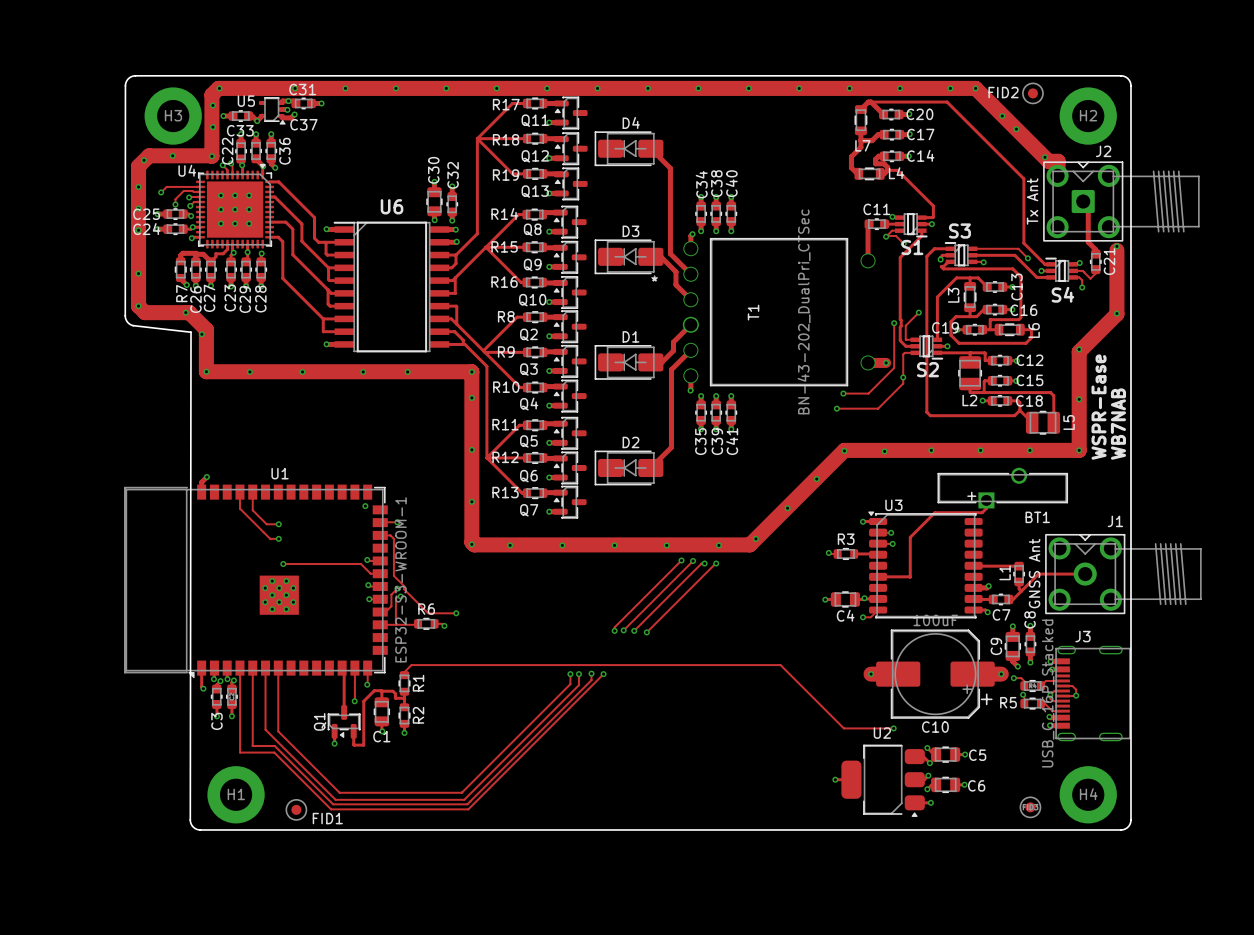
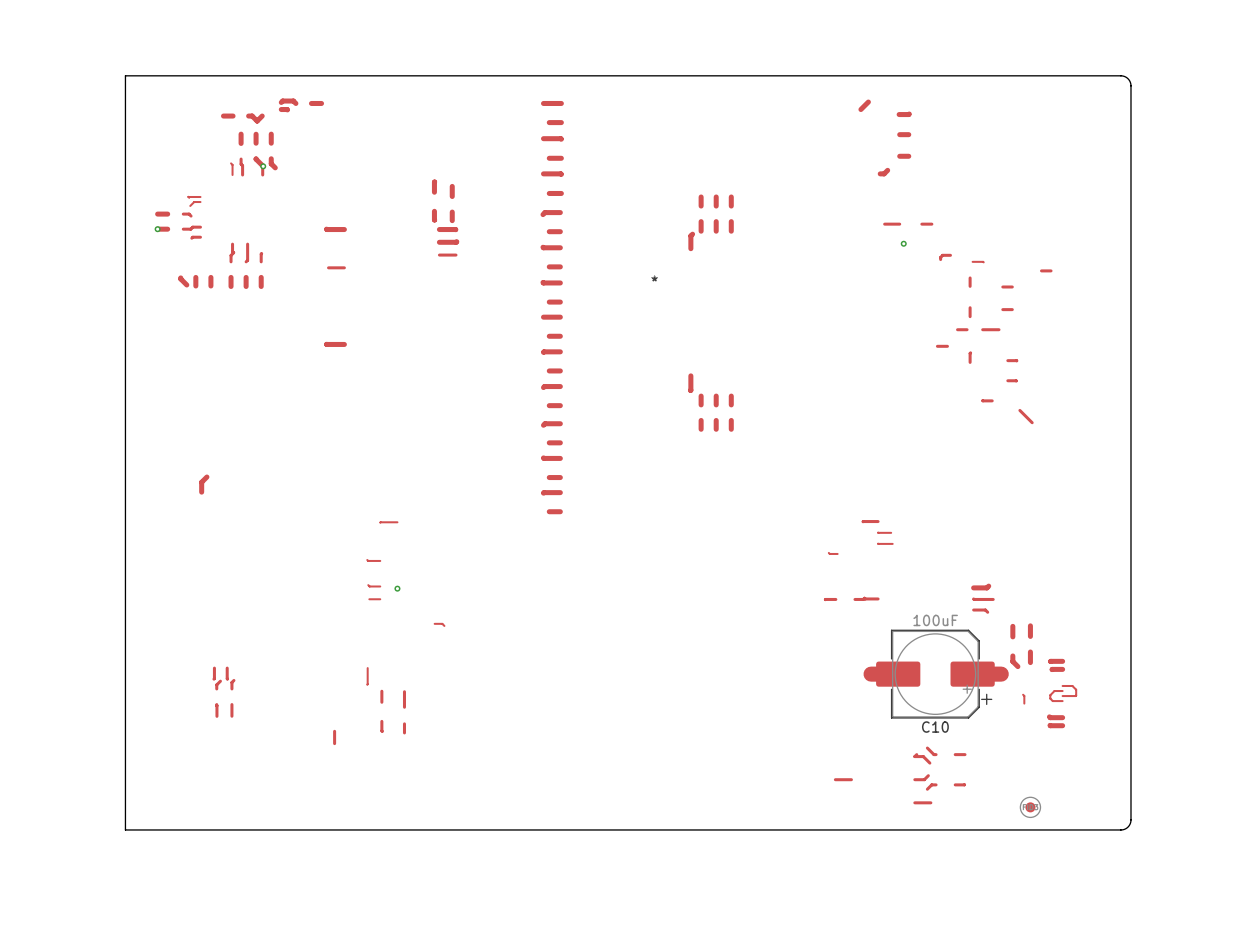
board edge: (135, 75) (128, 78) (125, 85) (125, 318) (128, 322) (133, 325) (191, 332) (190, 819) (193, 827) (200, 829) -> (135, 75) (125, 75) (125, 829) (200, 829)
via: (219, 88) -> none
via: (295, 88) -> none
via: (345, 88) -> none
via: (395, 88) -> none
via: (446, 88) -> none
via: (496, 88) -> none
via: (547, 88) -> none
via: (597, 88) -> none
via: (647, 88) -> none
via: (698, 88) -> none
via: (748, 88) -> none
via: (799, 88) -> none
via: (849, 88) -> none
via: (900, 88) -> none
via: (950, 88) -> none
via: (975, 88) -> none
FID2: (1032, 93) -> none
via: (288, 101) -> none
C31: (303, 103) -> none
via: (321, 103) -> none
track: (526, 103) (512, 103) (477, 138) -> none
R17: (535, 103) -> none
via: (212, 105) -> none
via: (287, 109) -> none
U5: (272, 110) -> none
Q11: (570, 113) -> none
track: (294, 114) (291, 117) (281, 116) -> none
via: (294, 114) -> none
track: (881, 114) (883, 114) (871, 102) (868, 102) (947, 102) (1023, 178) (1023, 243) (1045, 264) (1051, 264) -> none
C20: (891, 114) -> none
via: (909, 114) -> none
H3: (173, 116) -> none
via: (223, 116) -> none
C33: (240, 116) -> none
via: (1002, 116) -> none
H2: (1088, 116) -> none
L7: (860, 120) -> none
via: (257, 121) -> none
via: (549, 122) -> none
via: (212, 127) -> none
via: (1016, 129) -> none
track: (860, 130) (860, 147) (851, 156) (851, 167) (858, 173) -> none
via: (241, 134) -> none
via: (256, 134) -> none
via: (271, 134) -> none
track: (884, 134) (878, 134) (872, 140) (860, 140) -> none
C17: (891, 134) -> none
via: (909, 134) -> none
track: (477, 138) (512, 173) (526, 173) -> none
track: (477, 138) (477, 233) (456, 255) (456, 263) (451, 267) (439, 267) -> none
track: (477, 138) (526, 138) -> none
R18: (535, 138) -> none
Q12: (570, 148) -> none
D4: (629, 148) -> none
track: (650, 148) (670, 168) (670, 253) (690, 274) -> none
C37: (256, 150) -> none
C36: (271, 150) -> none
C22: (241, 151) -> none
via: (172, 155) -> none
via: (211, 156) -> none
track: (884, 156) (878, 156) (875, 159) (875, 163) (884, 163) (887, 170) (897, 170) (933, 206) (932, 217) (921, 217) -> none
C14: (891, 156) -> none
via: (908, 156) -> none
via: (1045, 157) -> none
via: (549, 158) -> none
via: (144, 160) -> none
via: (231, 163) -> none
track: (222, 165) (227, 170) (227, 175) -> none
via: (222, 165) -> none
via: (242, 165) -> none
via: (275, 167) -> none
R19: (535, 173) -> none
L4: (869, 173) -> none
track: (1057, 175) (1058, 161) (1048, 161) (975, 88) (218, 88) (211, 94) (211, 156) (149, 155) (138, 166) (138, 306) (145, 312) (189, 312) (206, 329) (206, 371) (471, 371) (471, 542) (474, 544) (749, 544) (844, 450) (1079, 450) (1079, 351) (1116, 314) (1116, 250) -> none
track: (269, 181) (278, 181) (314, 217) (314, 238) (318, 242) (344, 242) -> none
via: (434, 181) -> none
Q13: (570, 183) -> none
via: (138, 186) -> none
track: (200, 186) (166, 186) (161, 192) -> none
via: (452, 186) -> none
track: (200, 191) (183, 190) (175, 199) (175, 206) -> none
via: (161, 192) -> none
via: (549, 193) -> none
via: (220, 195) -> none
via: (235, 195) -> none
via: (249, 195) -> none
track: (269, 196) (274, 196) (301, 224) (301, 241) (328, 267) (328, 279) (344, 280) -> none
via: (701, 196) -> none
via: (716, 196) -> none
via: (731, 196) -> none
via: (189, 197) -> none
C30: (434, 201) -> none
track: (1083, 201) (1088, 206) (1088, 242) (1095, 249) (1095, 254) -> none
J2: Tx Ant (1121, 201) -> none
via: (175, 204) -> none
C32: (452, 204) -> none
via: (190, 205) -> none
U4: (235, 206) -> none
via: (138, 208) -> none
via: (220, 209) -> none
via: (235, 209) -> none
via: (249, 209) -> none
C34: (701, 213) -> none
C38: (716, 213) -> none
C40: (731, 213) -> none
via: (157, 214) -> none
C25: (175, 214) -> none
track: (526, 214) (518, 214) (452, 280) (439, 280) -> none
R14: (534, 214) -> none
via: (191, 216) -> none
via: (892, 216) -> none
via: (434, 220) -> none
via: (452, 220) -> none
track: (269, 222) (285, 222) (292, 229) (292, 254) (331, 293) (344, 293) -> none
Q8: (569, 222) -> none
via: (220, 223) -> none
via: (235, 223) -> none
via: (249, 223) -> none
track: (869, 224) (868, 260) -> none
C11: (876, 224) -> none
via: (931, 224) -> none
S1: (911, 225) -> none
via: (192, 227) -> none
C24: (175, 229) -> none
via: (326, 229) -> none
via: (455, 229) -> none
via: (138, 230) -> none
track: (899, 230) (892, 230) (886, 236) -> none
track: (921, 230) (921, 235) (900, 257) (900, 340) (905, 346) (915, 346) -> none
via: (549, 231) -> none
via: (701, 231) -> none
via: (716, 231) -> none
via: (731, 231) -> none
via: (692, 234) -> none
track: (886, 235) (895, 235) (903, 243) -> none
via: (886, 236) -> none
track: (269, 237) (278, 237) (282, 241) (282, 278) (323, 318) -> none
via: (191, 238) -> none
via: (456, 241) -> none
track: (325, 242) (327, 255) (344, 255) -> none
track: (227, 244) (227, 249) (223, 253) (215, 253) (215, 256) (210, 261) (203, 254) (196, 254) -> none
via: (1116, 246) -> none
track: (526, 247) (485, 247) (521, 282) (526, 282) -> none
R15: (534, 247) -> none
track: (950, 248) (934, 248) (926, 256) (926, 412) (930, 415) (1014, 415) (1019, 410) (1019, 402) (1007, 400) -> none
track: (972, 248) (1018, 248) (1027, 258) -> none
via: (233, 252) -> none
via: (247, 252) -> none
via: (261, 253) -> none
S3: (961, 254) -> none
track: (972, 255) (1014, 255) (1036, 277) (1051, 277) -> none
D3: (629, 256) -> none
track: (650, 256) (660, 256) (675, 271) (675, 284) (690, 299) -> none
Q9: (569, 257) -> none
via: (1027, 258) -> none
via: (940, 259) -> none
track: (180, 261) (182, 253) (196, 253) (195, 261) -> none
track: (950, 261) (941, 266) (943, 268) (1012, 268) (1020, 276) (1020, 317) (1018, 319) (990, 319) (990, 329) -> none
C21: (1095, 261) -> none
via: (983, 262) -> none
via: (1079, 262) -> none
via: (549, 266) -> none
R7: (180, 269) -> none
C26: (195, 269) -> none
C27: (210, 269) -> none
C23: (231, 269) -> none
C29: (246, 269) -> none
C28: (261, 269) -> none
S4: (1061, 269) -> none
via: (1041, 270) -> none
track: (1073, 270) (1082, 270) (1090, 278) (1095, 273) (1095, 269) (1094, 270) -> none
via: (138, 273) -> none
track: (455, 277) (455, 293) (439, 293) -> none
track: (1073, 277) (1079, 277) (1082, 280) (1082, 287) -> none
R16: (534, 282) -> none
via: (186, 284) -> none
via: (195, 285) -> none
via: (210, 285) -> none
via: (231, 286) -> none
via: (246, 286) -> none
via: (261, 286) -> none
U6: (391, 286) -> none
track: (987, 286) (978, 277) (956, 277) (937, 297) (937, 339) -> none
C13: (994, 286) -> none
via: (1012, 286) -> none
via: (1082, 287) -> none
track: (328, 290) (328, 304) (330, 306) (344, 306) -> none
Q10: (569, 292) -> none
L3: (970, 297) -> none
via: (549, 302) -> none
via: (138, 306) -> none
track: (439, 306) (456, 306) (456, 324) -> none
track: (987, 309) (983, 309) (976, 316) (956, 316) (951, 321) (951, 335) (959, 343) (1025, 343) (1031, 337) (1031, 329) (1020, 329) -> none
C16: (994, 309) -> none
via: (1012, 309) -> none
via: (185, 312) -> none
T1: BN-43-202_DualPri_CTSec (779, 312) -> none
track: (918, 312) (905, 325) (905, 339) (915, 339) -> none
via: (918, 312) -> none
via: (1116, 313) -> none
track: (526, 317) (517, 317) (483, 350) -> none
R8: (535, 317) -> none
track: (323, 318) (344, 318) -> none
track: (323, 318) (323, 331) -> none
track: (439, 318) (451, 318) (520, 387) (526, 387) -> none
track: (894, 323) (894, 367) (868, 393) (843, 393) -> none
via: (894, 323) -> none
track: (690, 324) (673, 342) (673, 350) (661, 362) (650, 362) -> none
Q2: (569, 326) -> none
via: (957, 329) -> none
C19: (974, 329) -> none
L6: (1009, 329) -> none
track: (323, 331) (344, 331) -> none
track: (439, 331) (454, 331) (463, 340) (463, 344) -> none
via: (201, 334) -> none
via: (549, 336) -> none
via: (326, 344) -> none
track: (439, 344) (464, 344) (486, 366) (486, 457) -> none
via: (947, 346) -> none
S2: (926, 347) -> none
via: (1079, 349) -> none
track: (690, 350) (671, 369) (671, 447) (650, 467) -> none
track: (484, 352) (526, 352) -> none
R9: (535, 352) -> none
track: (915, 352) (903, 354) (903, 383) (878, 408) (836, 408) -> none
track: (937, 352) (984, 352) (985, 360) (992, 360) -> none
C12: (1000, 360) -> none
via: (1016, 360) -> none
Q3: (569, 361) -> none
D1: (629, 362) -> none
track: (868, 362) (886, 362) -> none
via: (886, 362) -> none
via: (549, 370) -> none
via: (206, 371) -> none
via: (249, 371) -> none
via: (302, 371) -> none
via: (363, 371) -> none
via: (407, 371) -> none
via: (471, 371) -> none
L2: (970, 373) -> none
via: (903, 377) -> none
track: (992, 380) (984, 381) (984, 392) -> none
C15: (1000, 380) -> none
via: (1016, 381) -> none
track: (970, 384) (970, 392) (1050, 392) (1053, 395) (1053, 422) -> none
R10: (535, 387) -> none
via: (690, 390) -> none
via: (843, 393) -> none
Q4: (569, 396) -> none
via: (701, 396) -> none
via: (716, 396) -> none
via: (731, 396) -> none
via: (471, 397) -> none
via: (1079, 399) -> none
via: (982, 400) -> none
C18: (1000, 400) -> none
via: (549, 405) -> none
text: WSPR-Ease (1099, 407) -> none
via: (836, 408) -> none
C35: (701, 412) -> none
C39: (716, 412) -> none
C41: (731, 412) -> none
L5: (1043, 422) -> none
text: WB7NAB (1118, 424) -> none
track: (526, 425) (519, 425) (486, 457) -> none
R11: (535, 425) -> none
via: (701, 429) -> none
via: (716, 429) -> none
via: (731, 429) -> none
Q5: (569, 433) -> none
via: (549, 442) -> none
via: (471, 449) -> none
via: (844, 450) -> none
via: (931, 450) -> none
via: (980, 450) -> none
via: (1029, 450) -> none
via: (1079, 450) -> none
via: (884, 451) -> none
track: (486, 457) (526, 457) -> none
track: (486, 457) (522, 493) (526, 493) -> none
R12: (535, 457) -> none
Q6: (569, 467) -> none
D2: (629, 467) -> none
via: (206, 477) -> none
via: (549, 477) -> none
via: (816, 479) -> none
BT1: (1002, 488) -> none
track: (239, 492) (239, 508) (270, 538) (278, 538) -> none
track: (252, 492) (252, 510) (266, 524) (278, 524) -> none
R13: (535, 493) -> none
track: (986, 500) (986, 508) (982, 512) (934, 512) (910, 537) (910, 577) (878, 576) -> none
via: (471, 501) -> none
Q7: (569, 502) -> none
via: (365, 506) -> none
via: (787, 508) -> none
via: (549, 511) -> none
via: (863, 521) -> none
via: (397, 522) -> none
via: (278, 524) -> none
via: (891, 532) -> none
track: (380, 535) (390, 535) (393, 538) (393, 575) (403, 585) (403, 589) (428, 613) (456, 613) -> none
via: (278, 538) -> none
via: (755, 538) -> none
via: (892, 543) -> none
via: (471, 544) -> none
via: (510, 545) -> none
via: (562, 545) -> none
via: (614, 545) -> none
via: (666, 545) -> none
via: (718, 545) -> none
via: (828, 552) -> none
R3: (845, 553) -> none
track: (854, 553) (878, 554) -> none
via: (367, 559) -> none
track: (681, 560) (614, 627) (614, 630) -> none
via: (681, 560) -> none
track: (693, 561) (623, 630) -> none
via: (693, 561) -> none
track: (704, 563) (701, 563) (634, 630) -> none
via: (704, 563) -> none
track: (716, 563) (646, 632) -> none
via: (716, 563) -> none
track: (283, 564) (361, 564) (370, 573) (380, 573) -> none
via: (283, 564) -> none
U3: (925, 564) -> none
track: (973, 565) (1019, 566) -> none
L1: (1019, 574) -> none
track: (1085, 574) (1038, 574) (1013, 599) (1008, 599) -> none
J1: GNSS Ant (1123, 574) -> none
U1: ESP32-S3-WROOM-1 (256, 581) -> none
track: (1019, 581) (1019, 588) (1021, 591) -> none
via: (368, 585) -> none
via: (988, 586) -> none
track: (397, 588) (391, 594) (391, 606) (385, 612) (380, 612) -> none
track: (400, 596) (395, 598) (395, 624) -> none
via: (400, 596) -> none
via: (864, 598) -> none
via: (369, 599) -> none
via: (825, 599) -> none
C4: (845, 599) -> none
C7: (1001, 599) -> none
track: (878, 610) (870, 617) (863, 617) -> none
via: (987, 612) -> none
via: (456, 613) -> none
via: (863, 617) -> none
track: (418, 623) (380, 624) -> none
R6: (426, 623) -> none
via: (444, 625) -> none
via: (1030, 625) -> none
via: (1012, 626) -> none
via: (614, 630) -> none
via: (623, 630) -> none
via: (634, 630) -> none
via: (646, 632) -> none
C8: (1030, 644) -> none
C9: (1012, 646) -> none
via: (1050, 661) -> none
via: (1030, 662) -> none
via: (1017, 666) -> none
track: (201, 668) (201, 686) (203, 688) -> none
track: (240, 668) (240, 752) (274, 752) (331, 809) (468, 809) (603, 674) -> none
track: (252, 668) (252, 745) -> none
track: (265, 668) (265, 729) (335, 799) (464, 799) (578, 685) (578, 674) -> none
track: (278, 668) (278, 731) (339, 792) (461, 792) (570, 684) (570, 674) -> none
track: (342, 668) (344, 670) (344, 712) -> none
track: (354, 668) (354, 701) -> none
via: (1052, 669) -> none
track: (591, 673) (591, 680) (467, 804) (333, 804) (274, 746) (252, 746) -> none
via: (591, 673) -> none
via: (570, 674) -> none
via: (578, 674) -> none
via: (603, 674) -> none
via: (871, 674) -> none
via: (1001, 674) -> none
track: (404, 675) (404, 672) (411, 665) (780, 665) (843, 728) (893, 728) -> none
track: (1013, 678) (1021, 678) (1024, 681) (1024, 685) -> none
via: (1013, 678) -> none
via: (213, 679) -> none
via: (227, 679) -> none
via: (233, 680) -> none
track: (1062, 680) (1045, 680) (1040, 685) -> none
via: (220, 681) -> none
R1: (404, 683) -> none
via: (367, 684) -> none
part: (1032, 685) -> none
via: (203, 688) -> none
J3: USB_C_16P_Stacked (1092, 693) -> none
via: (1023, 694) -> none
via: (1050, 695) -> none
via: (1076, 695) -> none
C3: (216, 696) -> none
part: (231, 696) -> none
track: (404, 699) (395, 698) (395, 693) (392, 691) (374, 690) (363, 701) (363, 745) (353, 744) (353, 731) -> none
via: (354, 701) -> none
R5: (1032, 703) -> none
track: (1040, 703) (1044, 703) (1052, 711) (1062, 711) -> none
C1: (381, 711) -> none
R2: (404, 715) -> none
via: (216, 716) -> none
via: (231, 716) -> none
via: (1049, 716) -> none
Q1: (344, 721) -> none
via: (1050, 725) -> none
via: (893, 728) -> none
via: (382, 731) -> none
via: (404, 732) -> none
via: (334, 743) -> none
via: (927, 748) -> none
C5: (945, 754) -> none
via: (965, 754) -> none
via: (929, 763) -> none
via: (928, 775) -> none
via: (835, 779) -> none
U2: (883, 780) -> none
C6: (945, 784) -> none
via: (964, 784) -> none
via: (927, 789) -> none
H1: (236, 794) -> none
H4: (1088, 794) -> none
via: (930, 802) -> none
FID1: (296, 809) -> none

